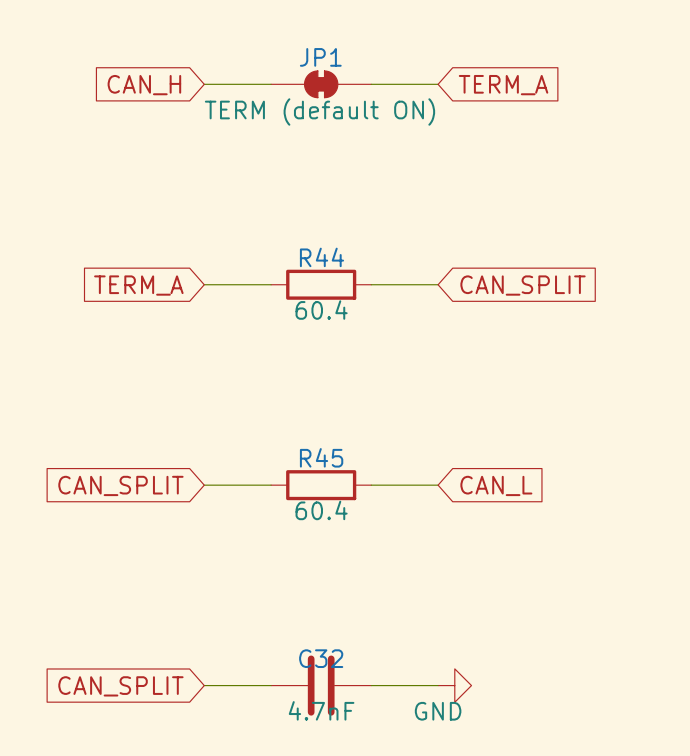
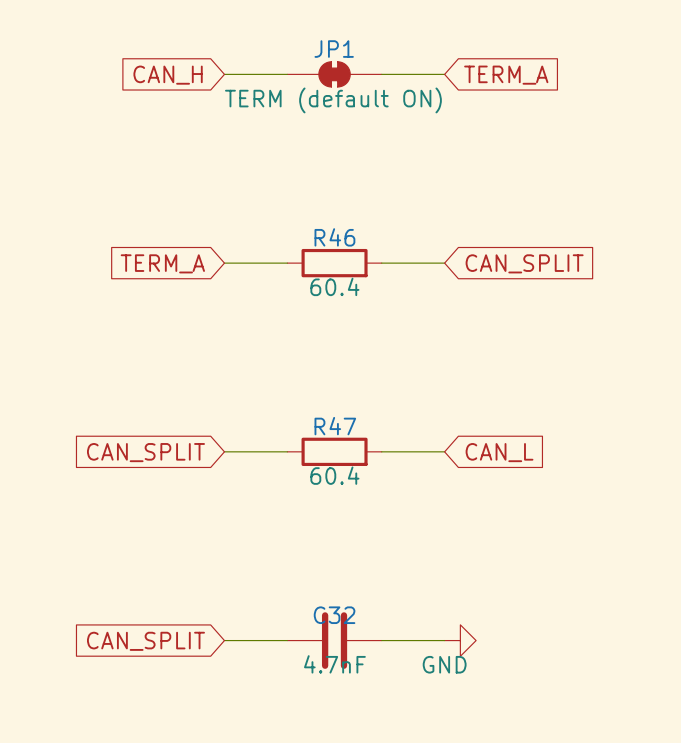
R44 name: R44 (321, 257) -> R46 (334, 237)
R45 name: R45 (321, 457) -> R47 (335, 426)

